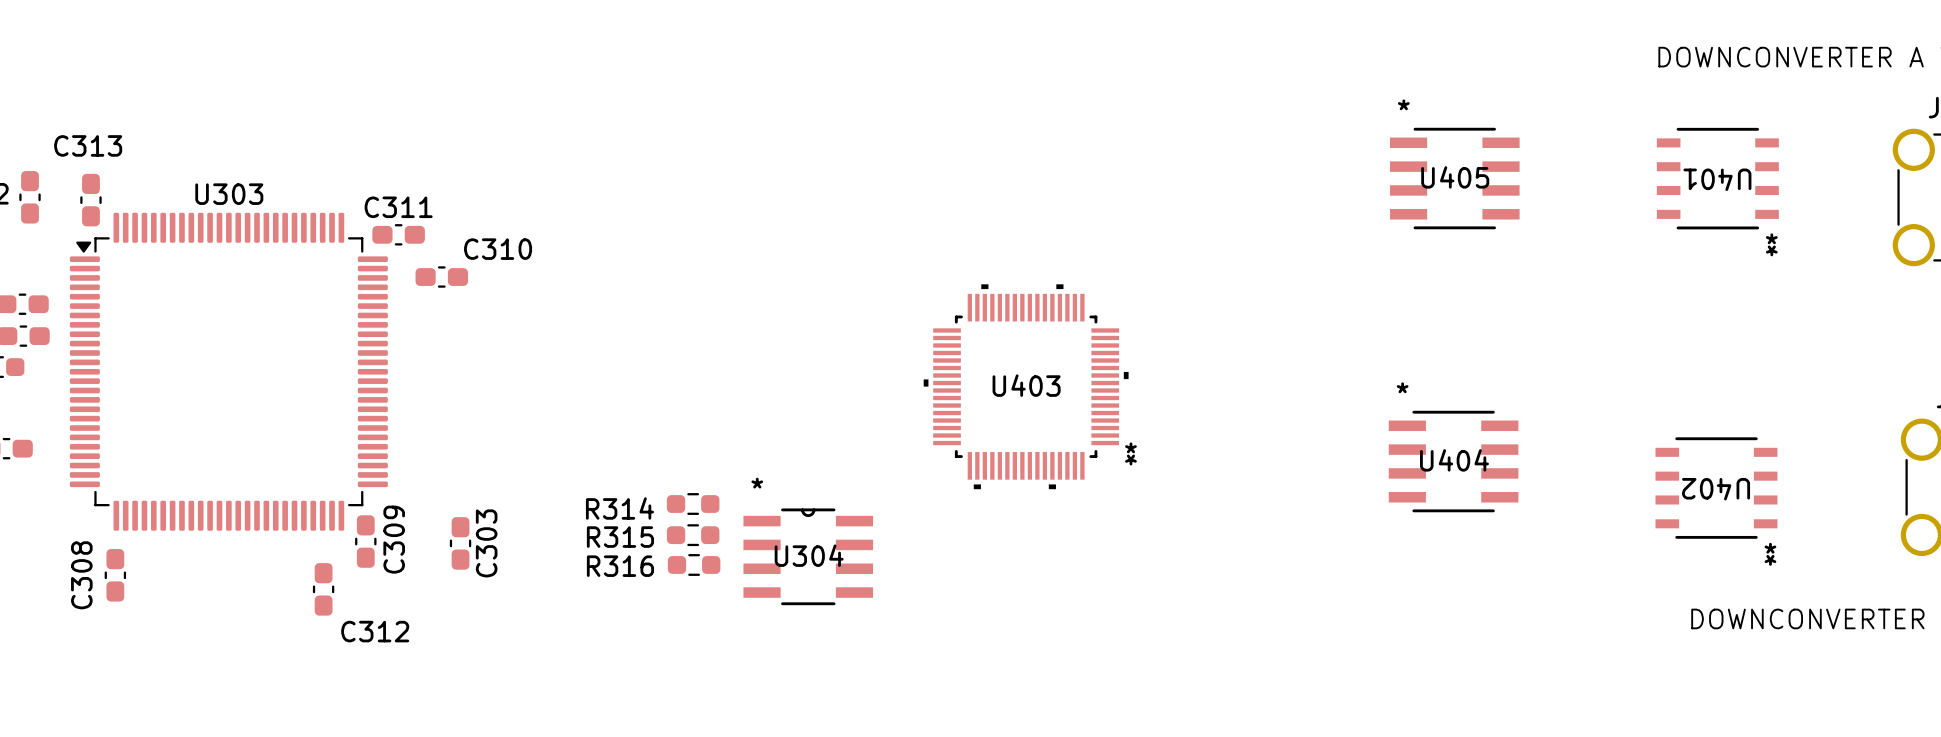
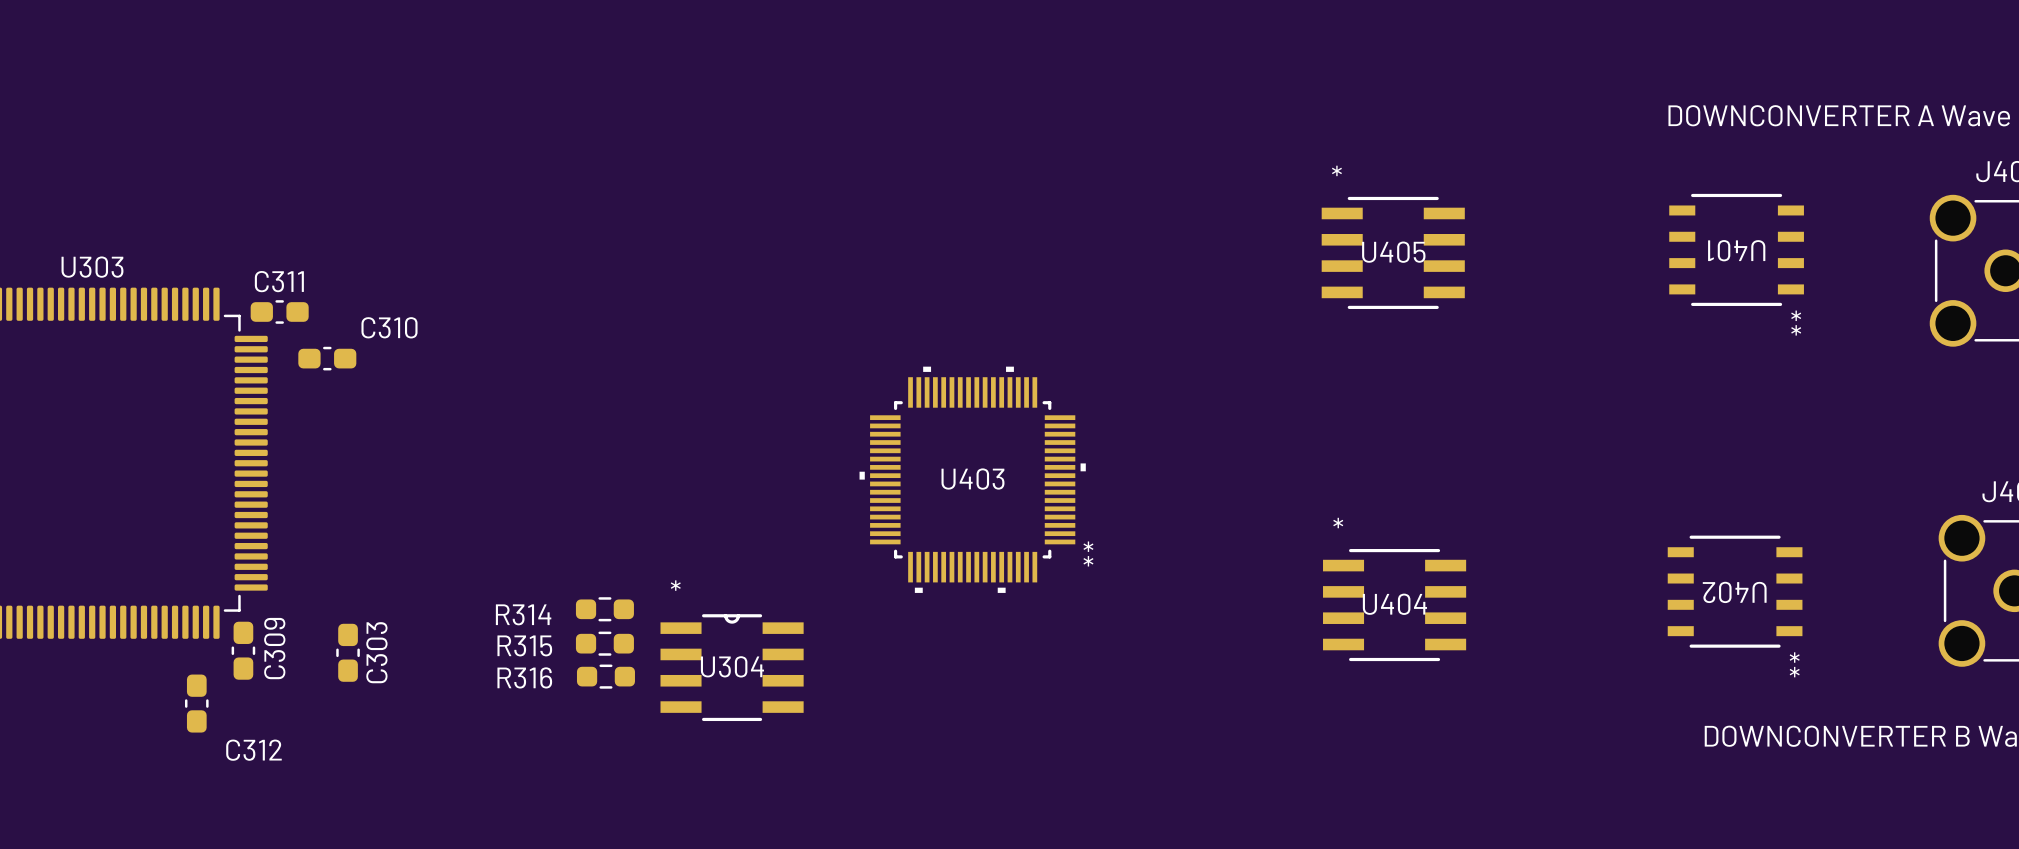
U405 position: (1454, 178) -> (1393, 252)
U404 position: (1453, 461) -> (1394, 605)

